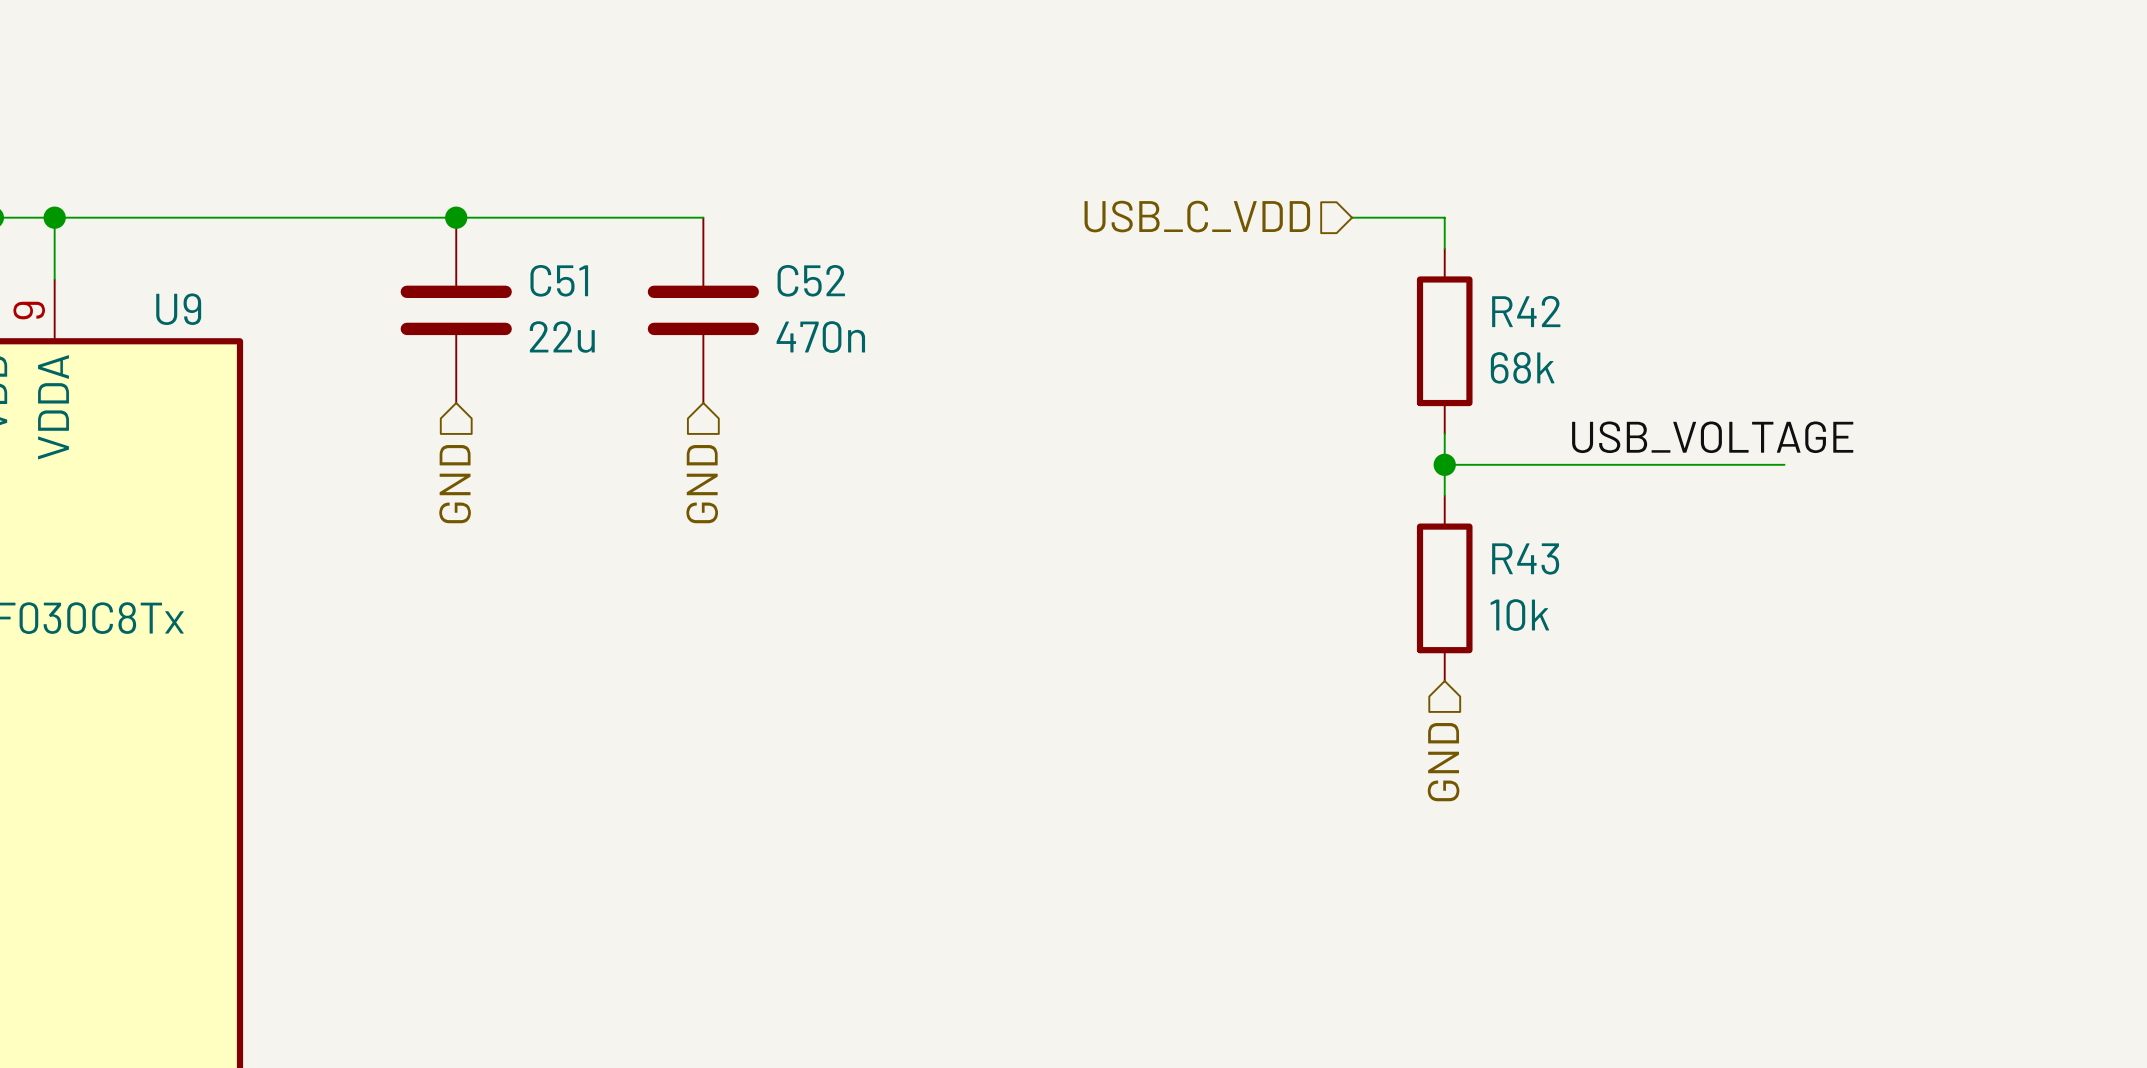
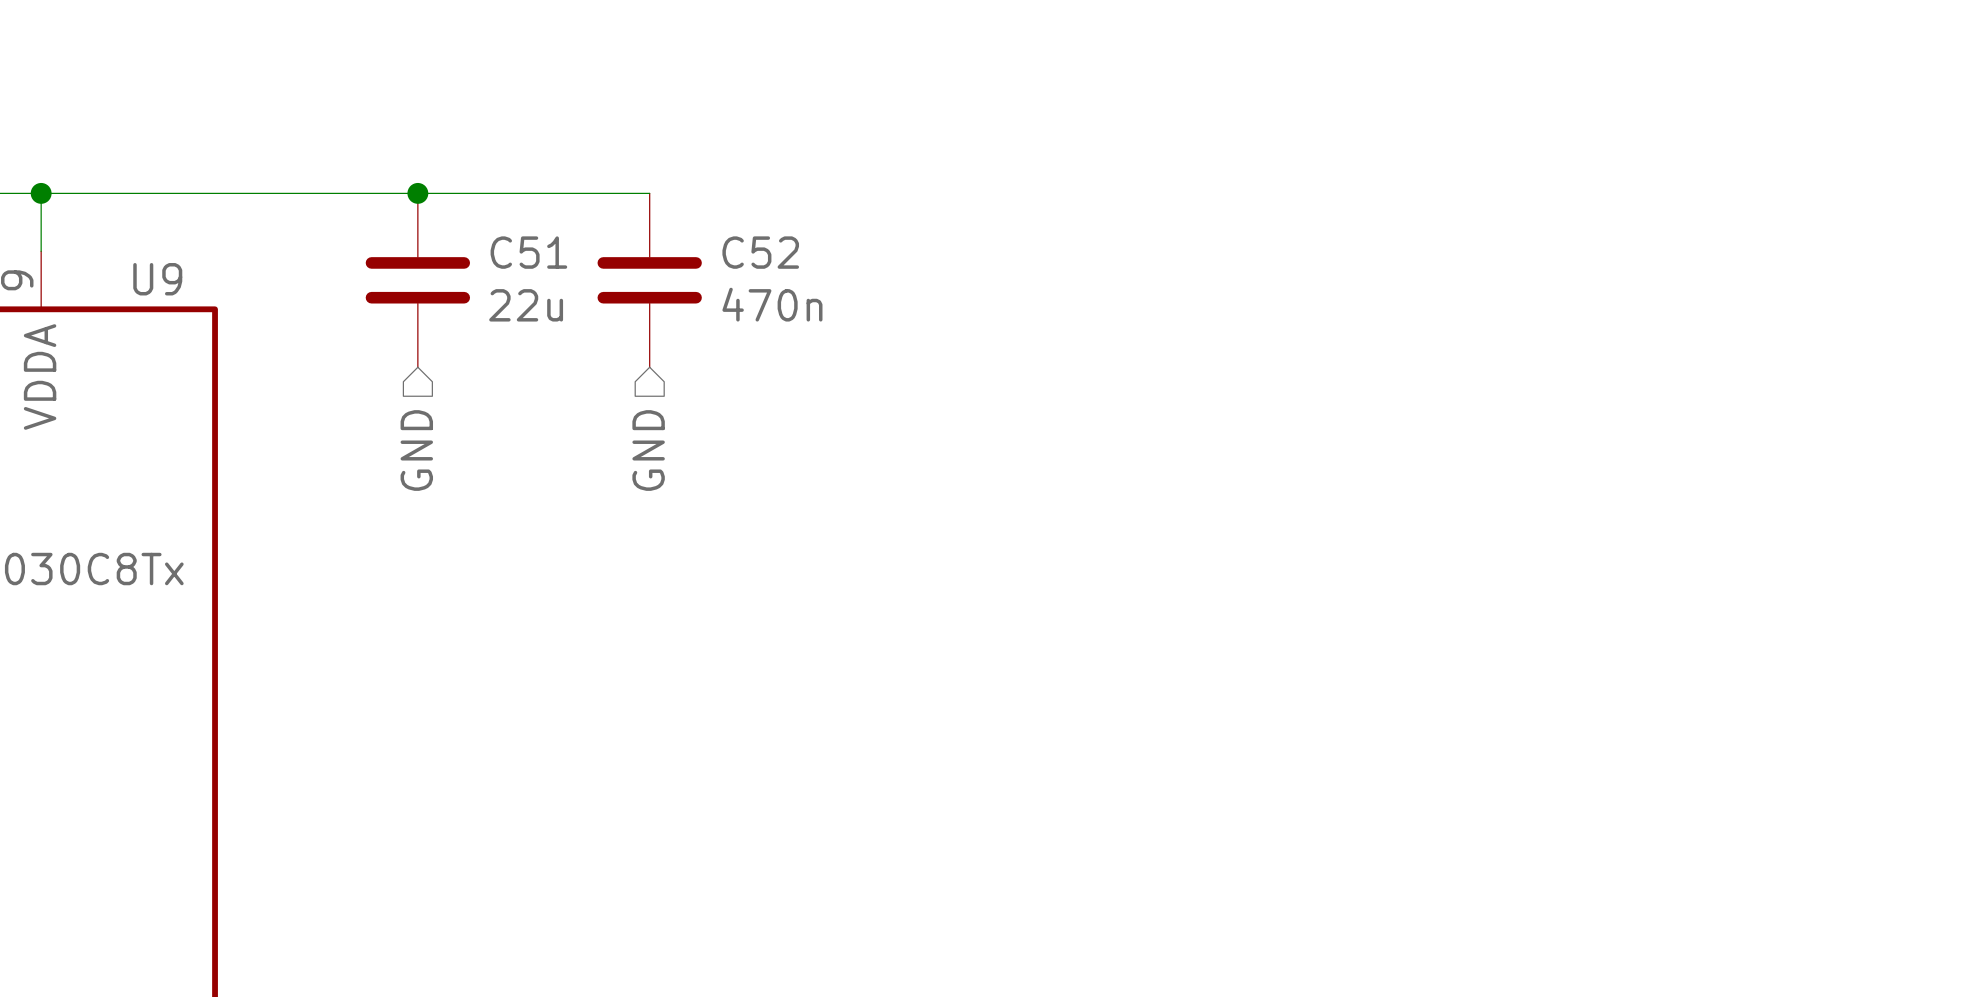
hierarchical label: USB_C_VDD (1197, 216) -> none
wire: (1352, 217) (1444, 217) (1444, 248) -> none
R42: 68k (1444, 341) -> none
wire: (1444, 433) (1444, 495) -> none
label: USB_VOLTAGE (1712, 437) -> none
wire: (1444, 464) (1784, 464) -> none
junction: (1444, 464) -> none
R43: 10k (1444, 588) -> none
hierarchical label: GND (1443, 762) -> none

